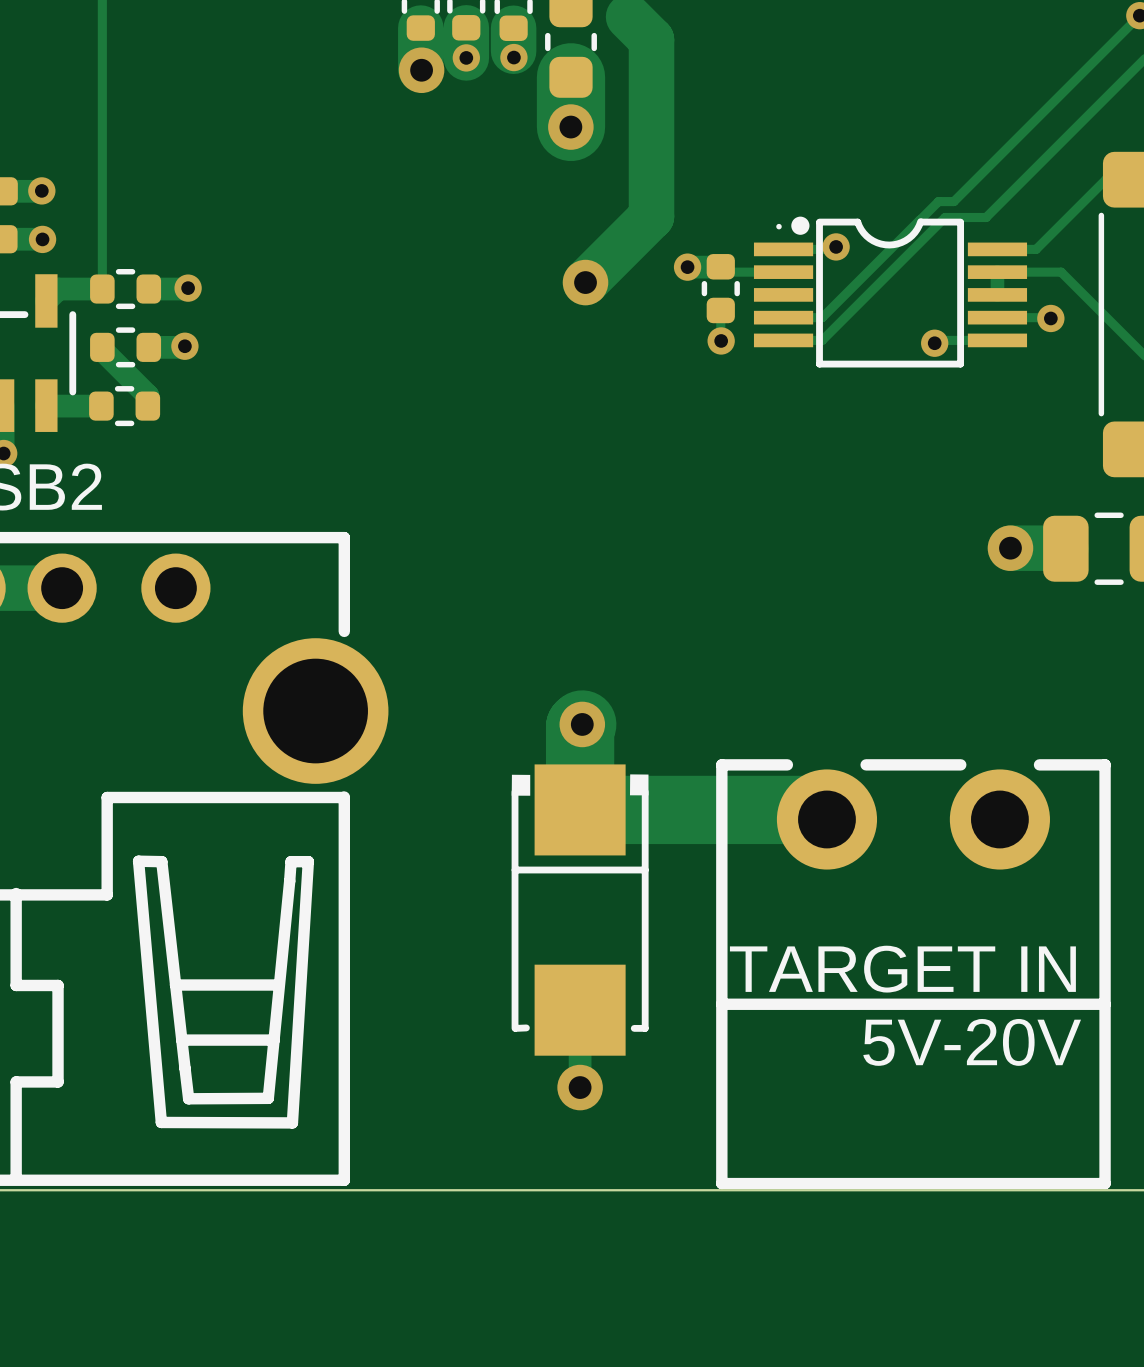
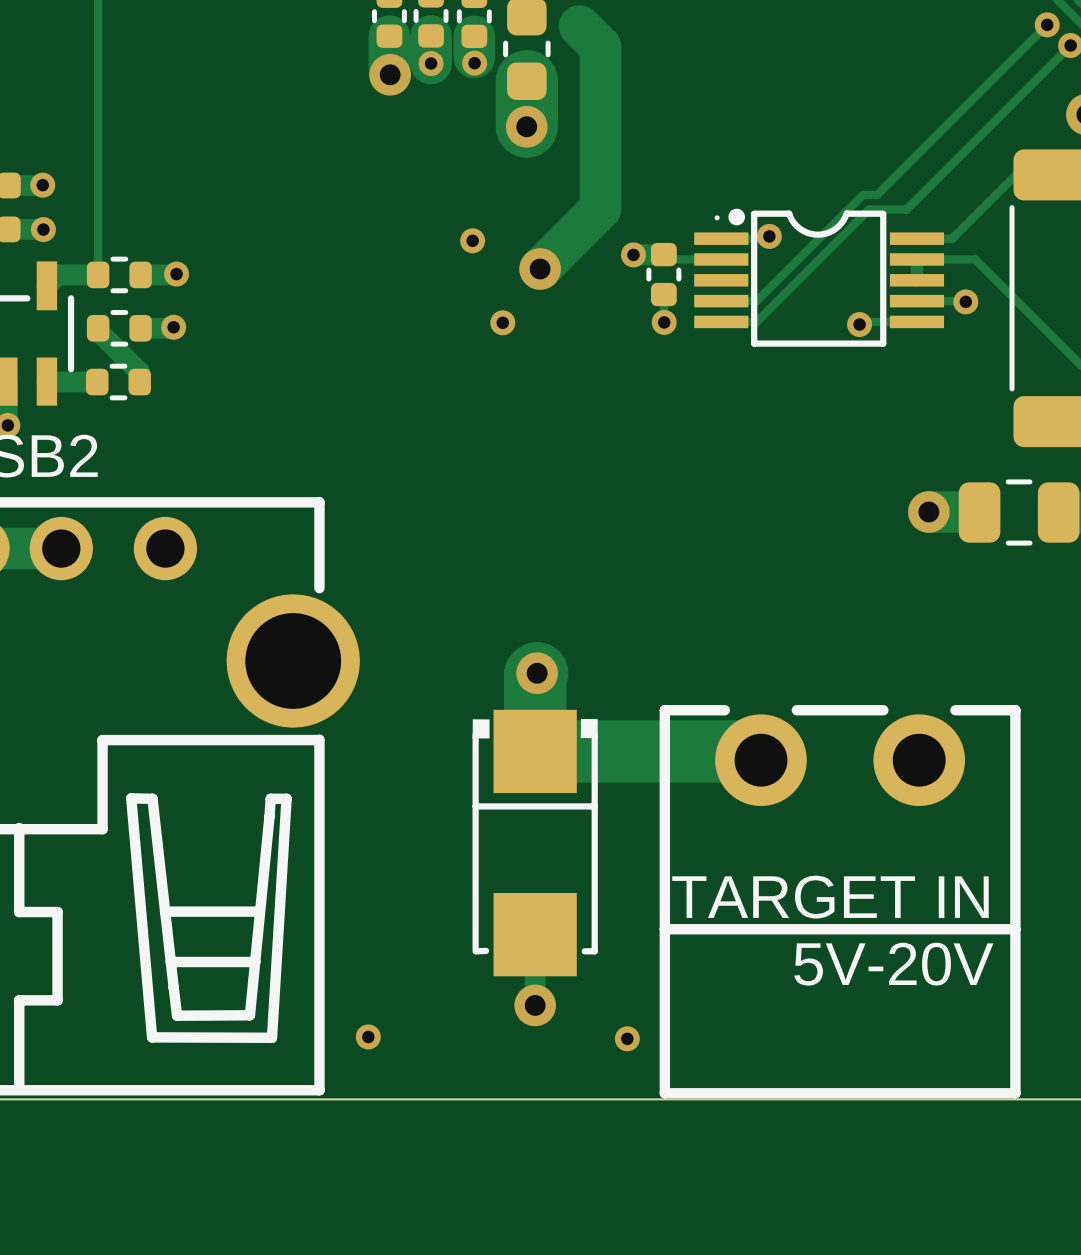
via: none -> (472, 240)
via: none -> (502, 322)
via: none -> (368, 1036)
via: none -> (627, 1038)

